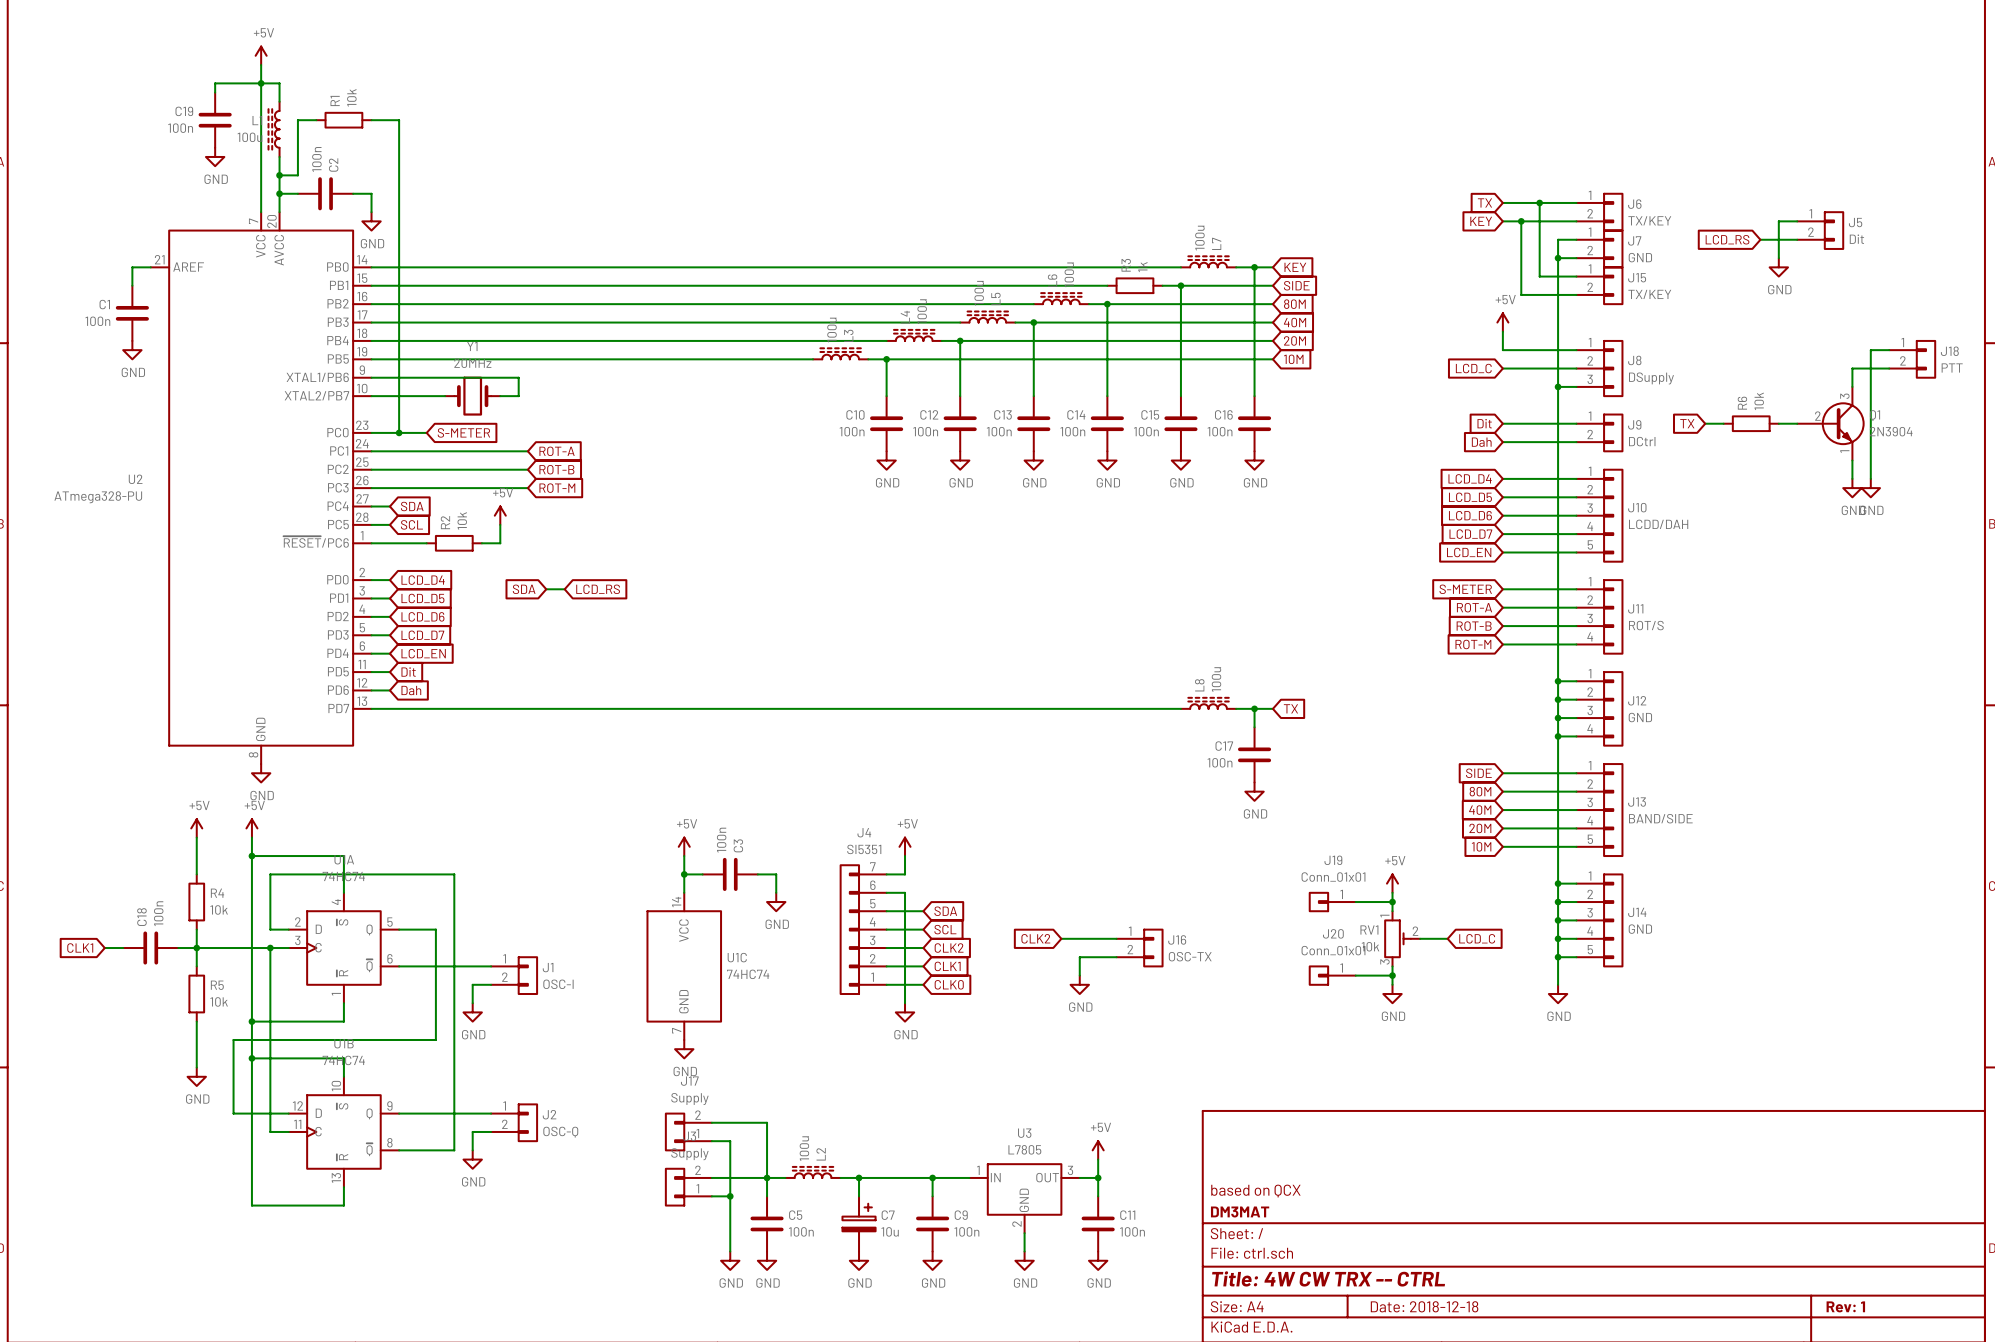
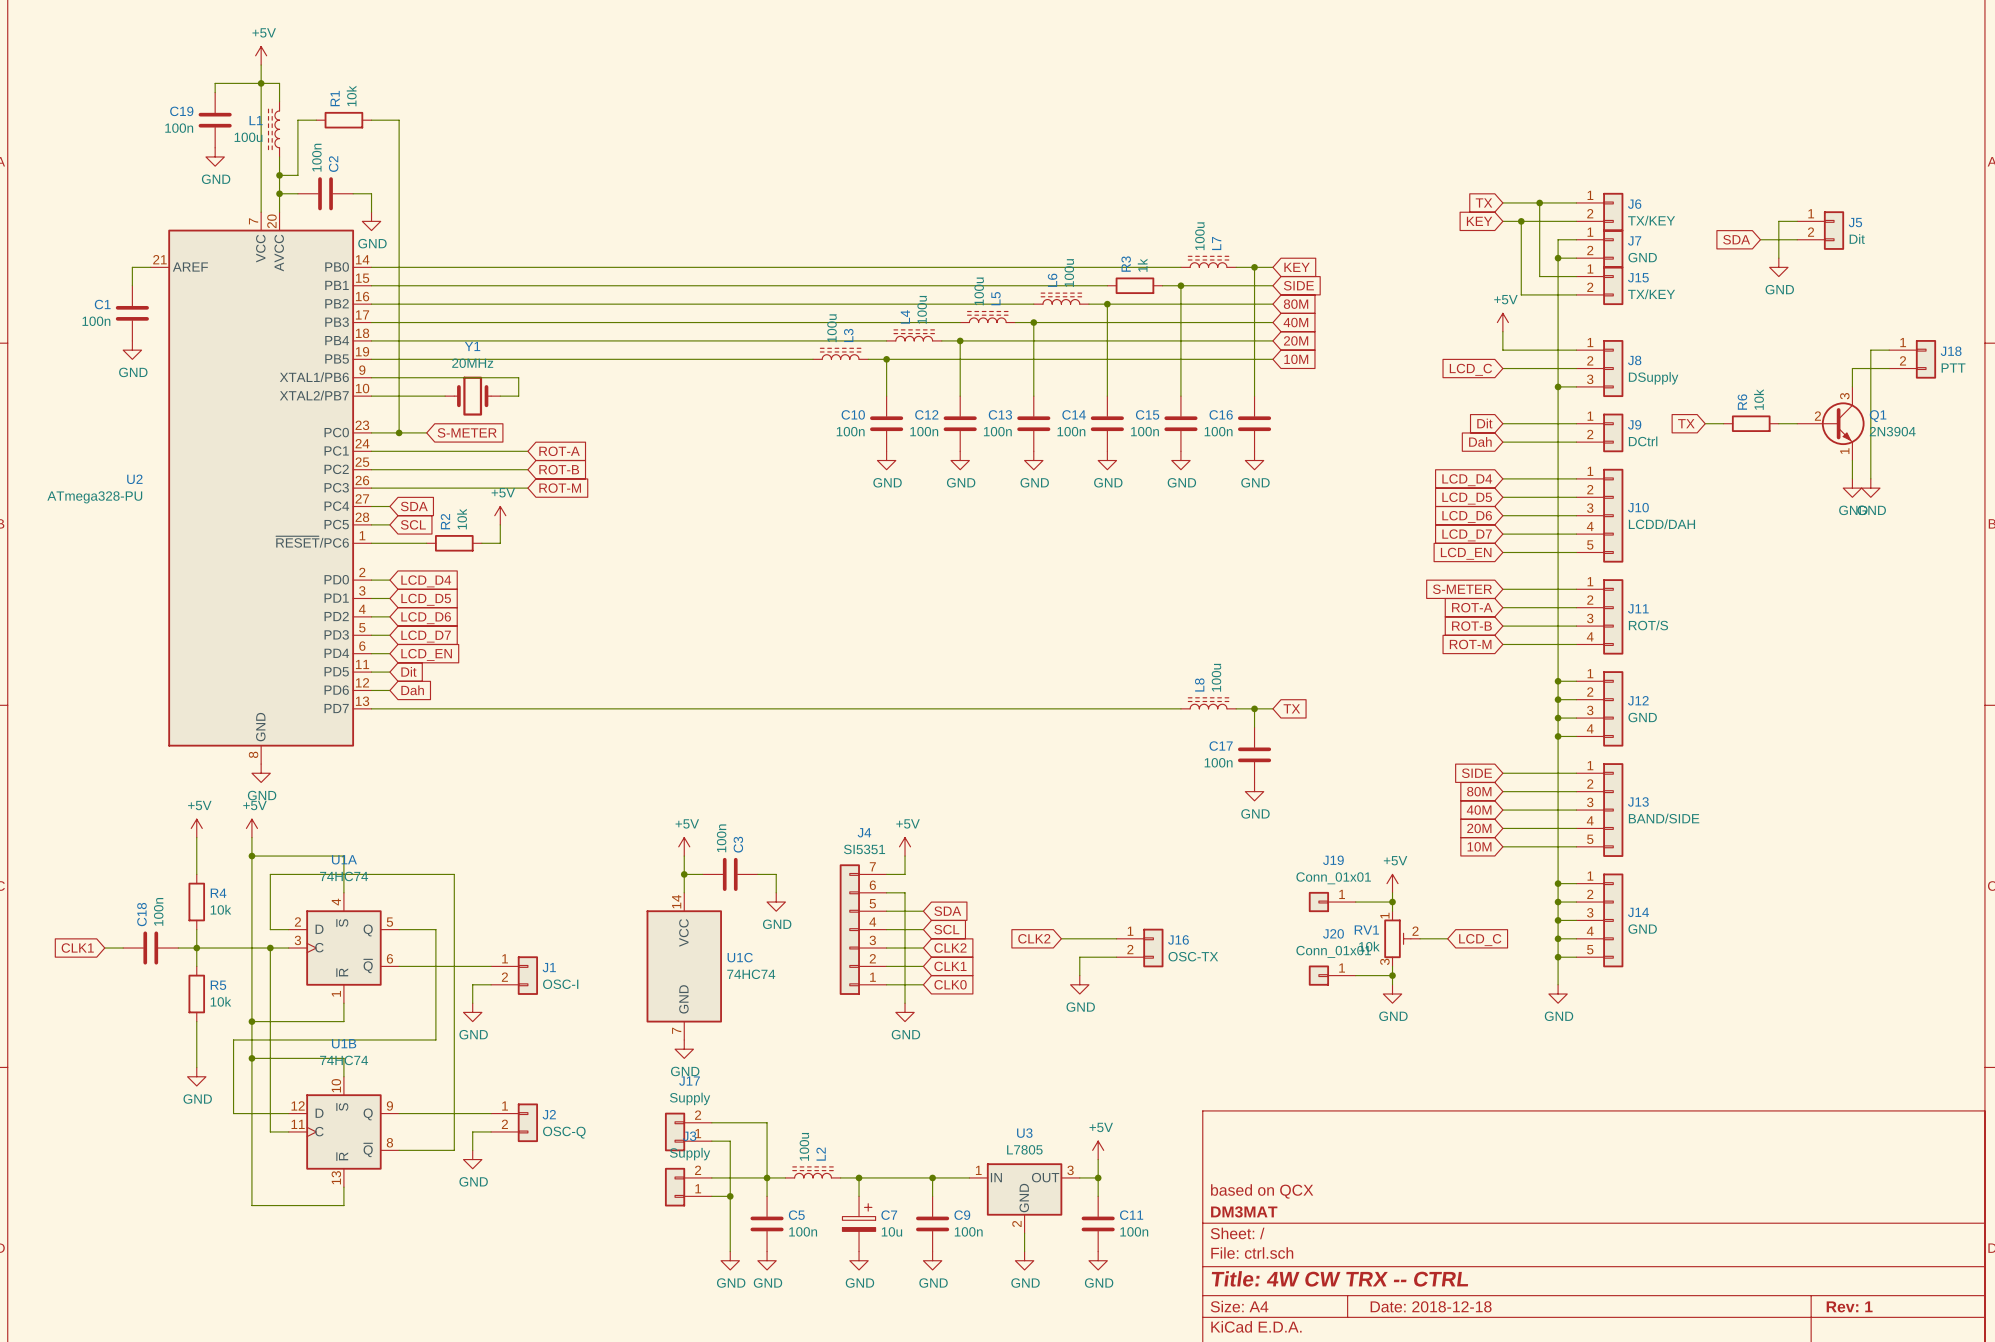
global label: LCD_RS (1727, 239) -> SDA (1736, 239)
global label: SDA (524, 589) -> none
wire: (546, 589) (564, 589) -> none
global label: LCD_RS (598, 589) -> none

